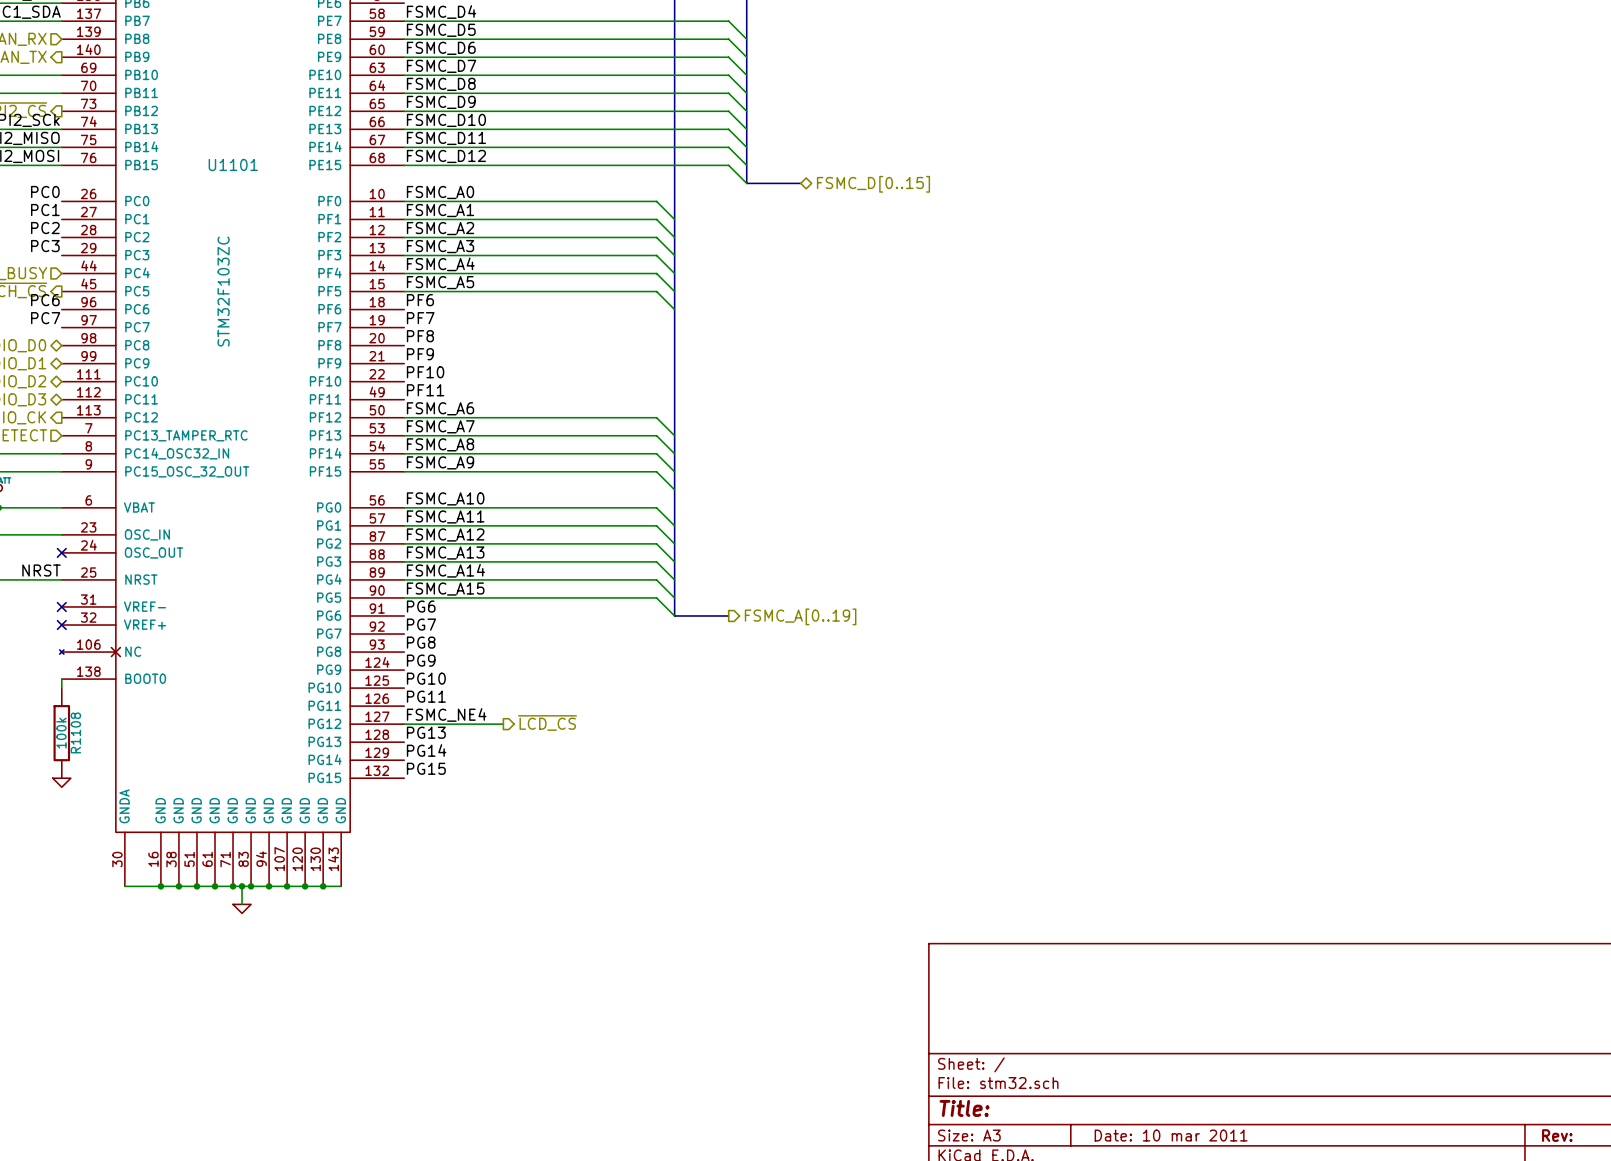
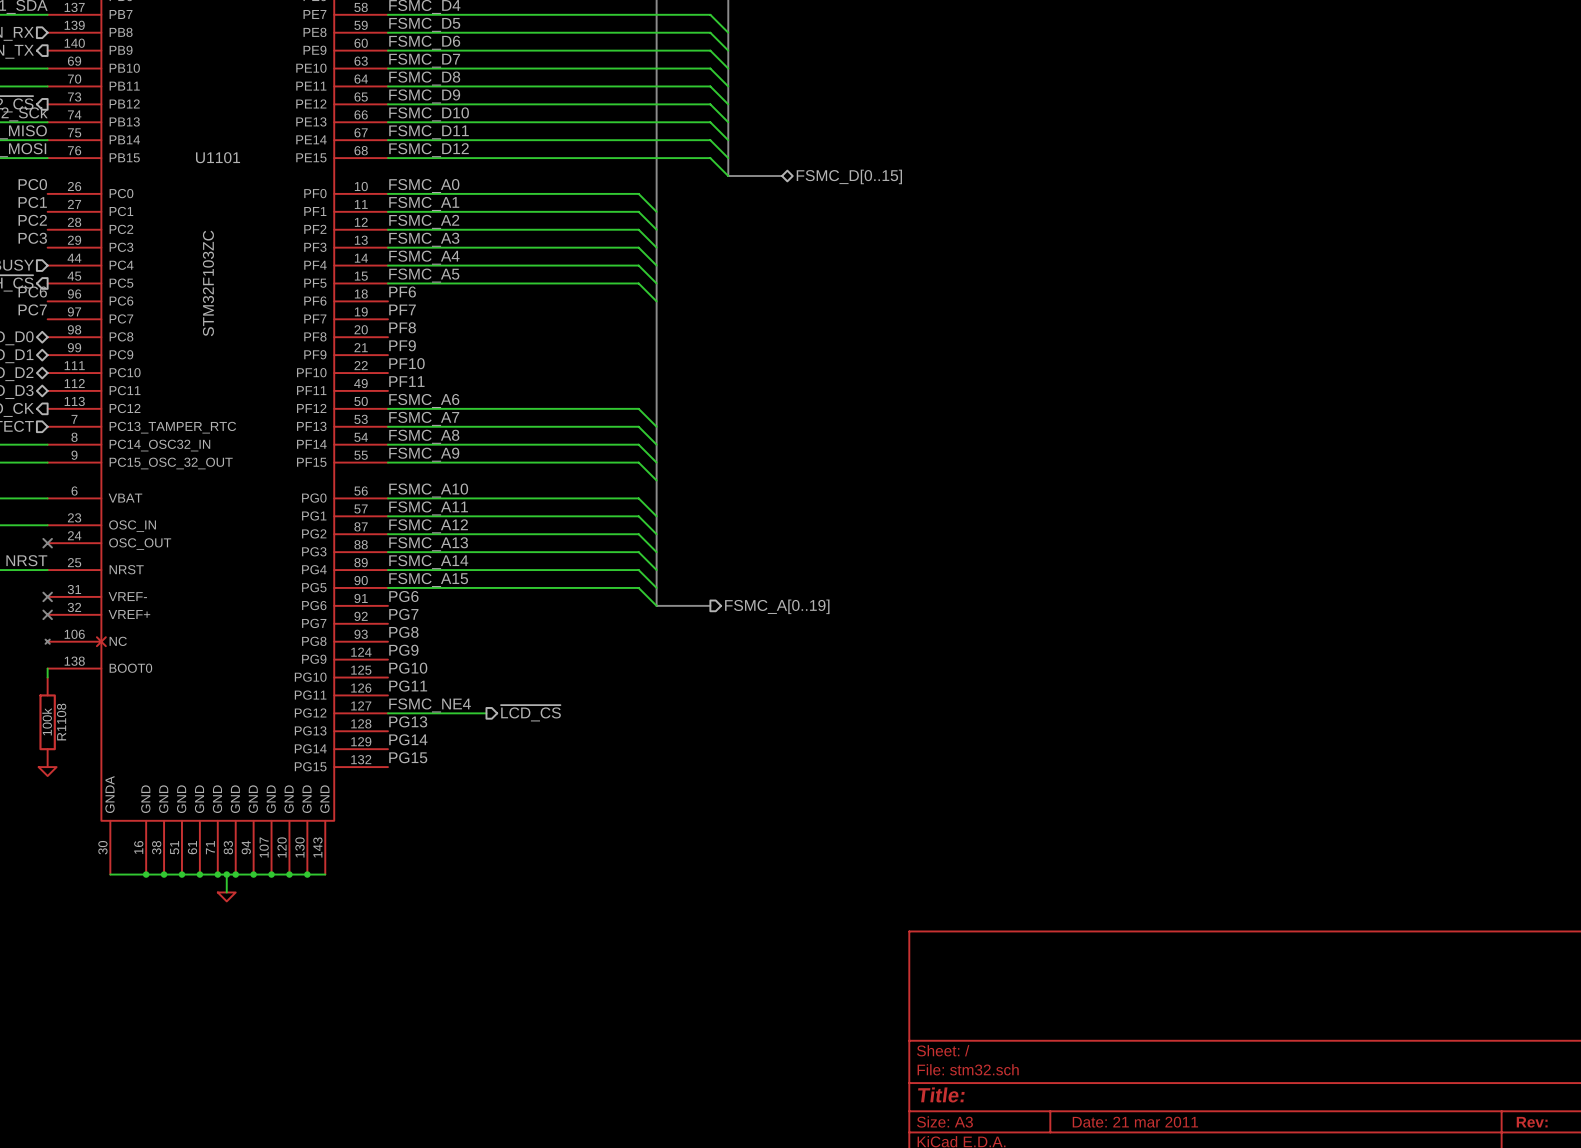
title block: Date: 10 mar 2011 (1171, 1135) -> Date: 21 mar 2011 (1135, 1122)

